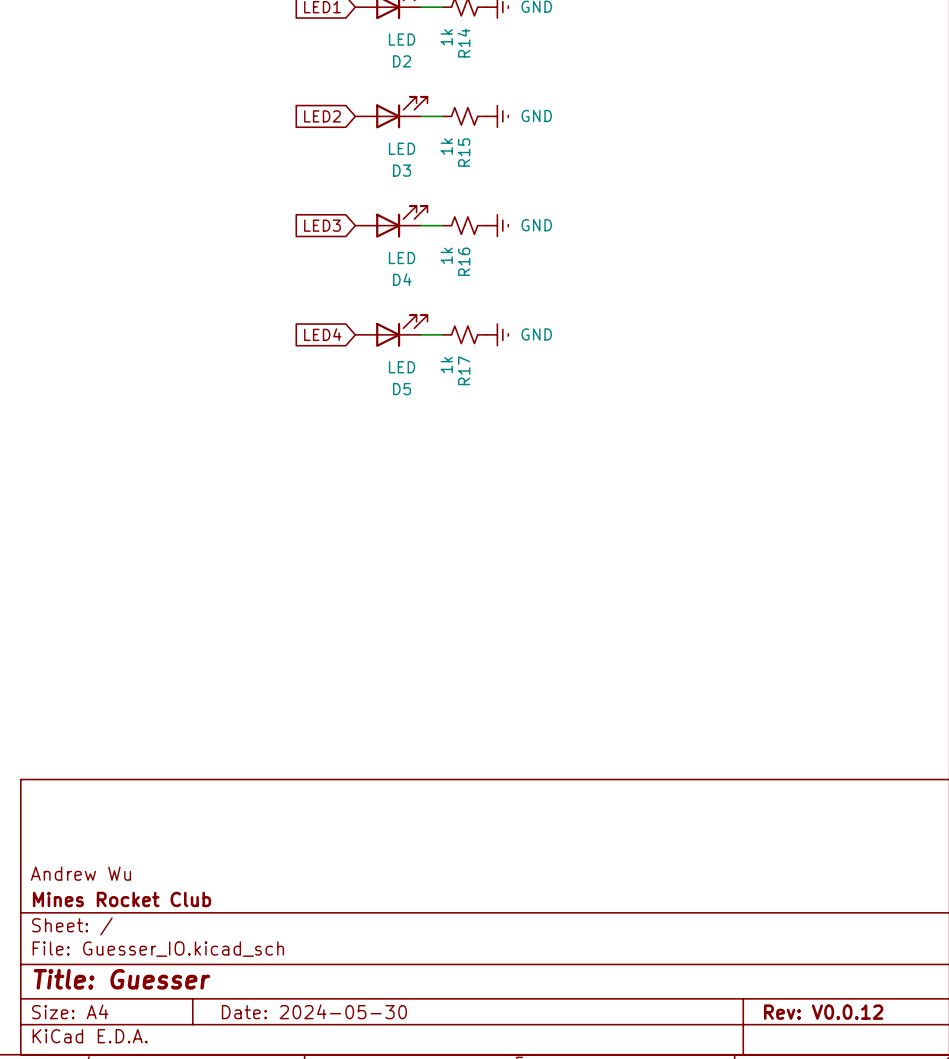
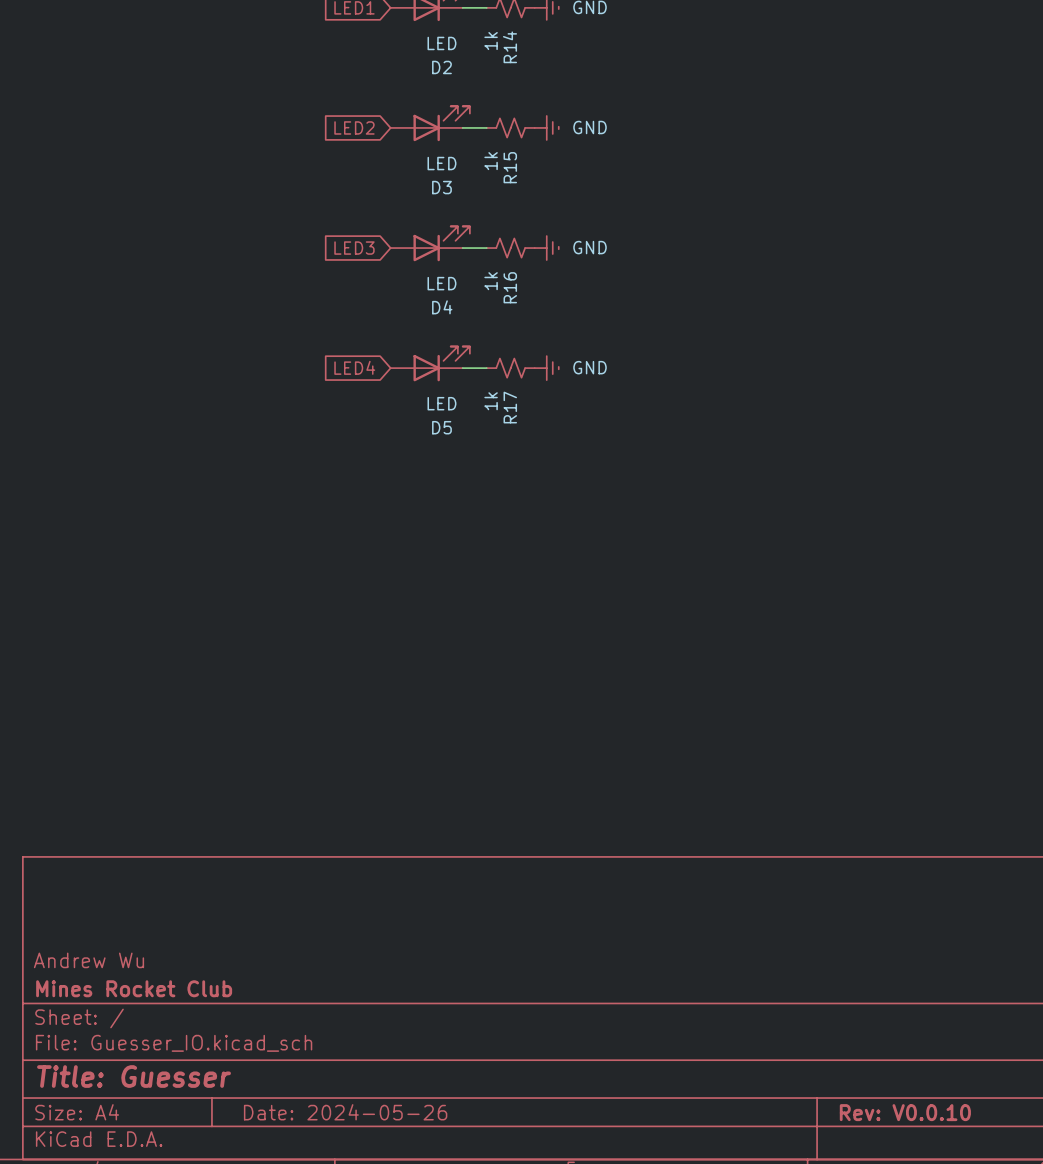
title block: Date: 2024-05-30 (314, 1011) -> Date: 2024-05-26 (345, 1112)
title block: Rev: V0.0.12 (823, 1012) -> Rev: V0.0.10 (905, 1112)

